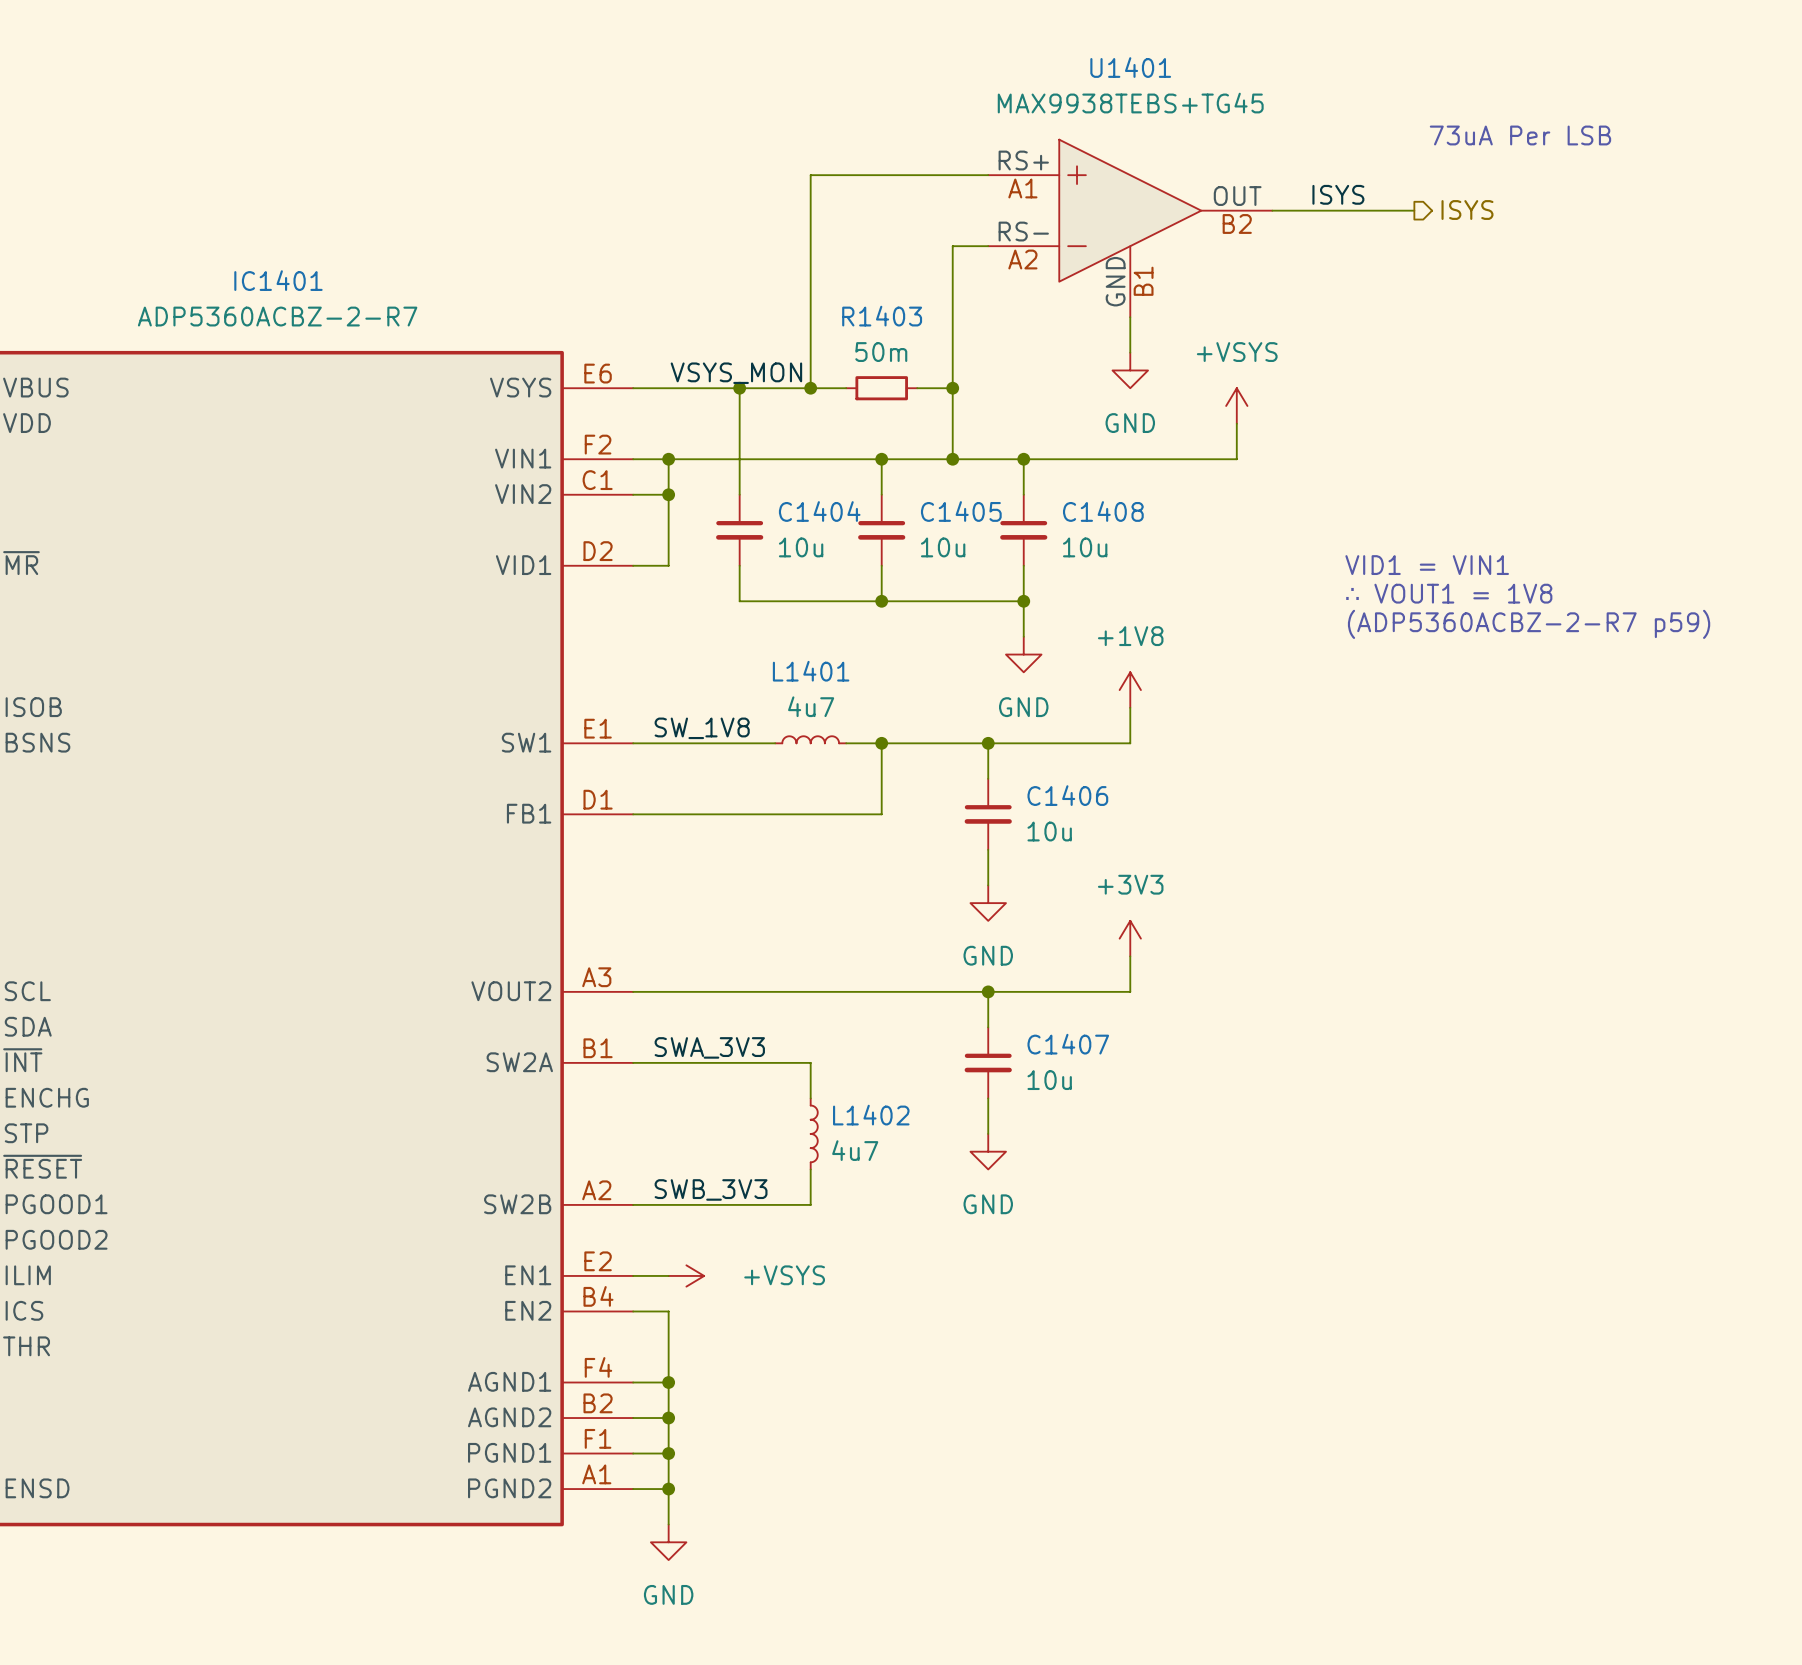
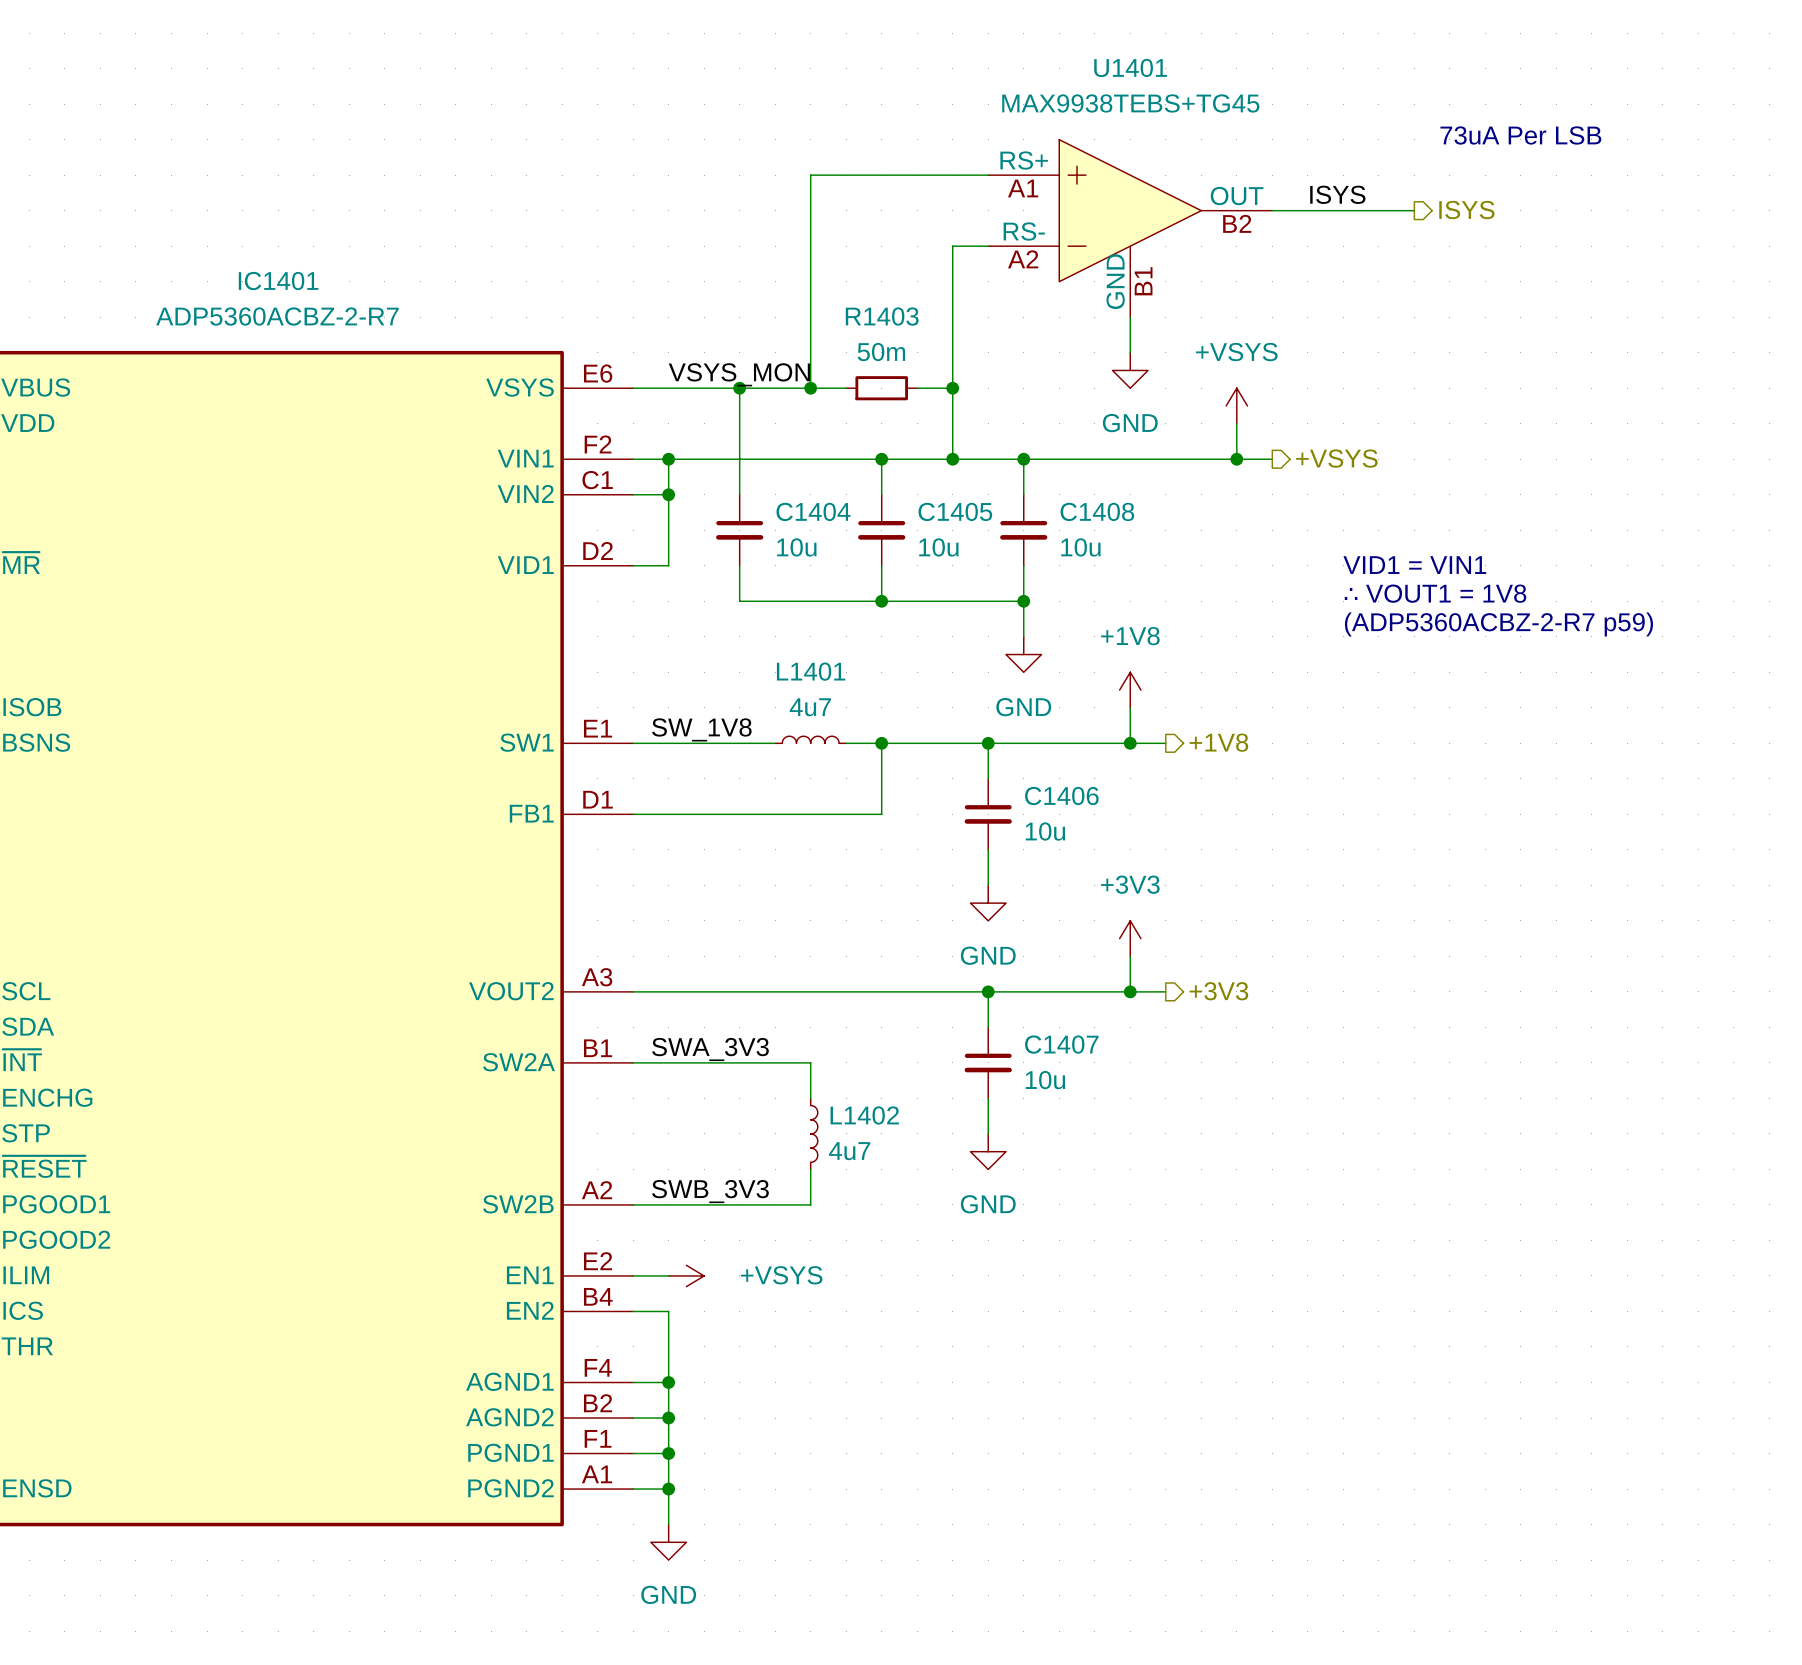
hierarchical label: none -> +VSYS (1336, 458)
wire: none -> (1236, 459) (1272, 459)
junction: none -> (1236, 459)
hierarchical label: none -> +1V8 (1218, 742)
wire: none -> (1130, 743) (1165, 743)
junction: none -> (1130, 743)
wire: none -> (1130, 991) (1165, 991)
junction: none -> (1130, 991)
hierarchical label: none -> +3V3 (1218, 991)

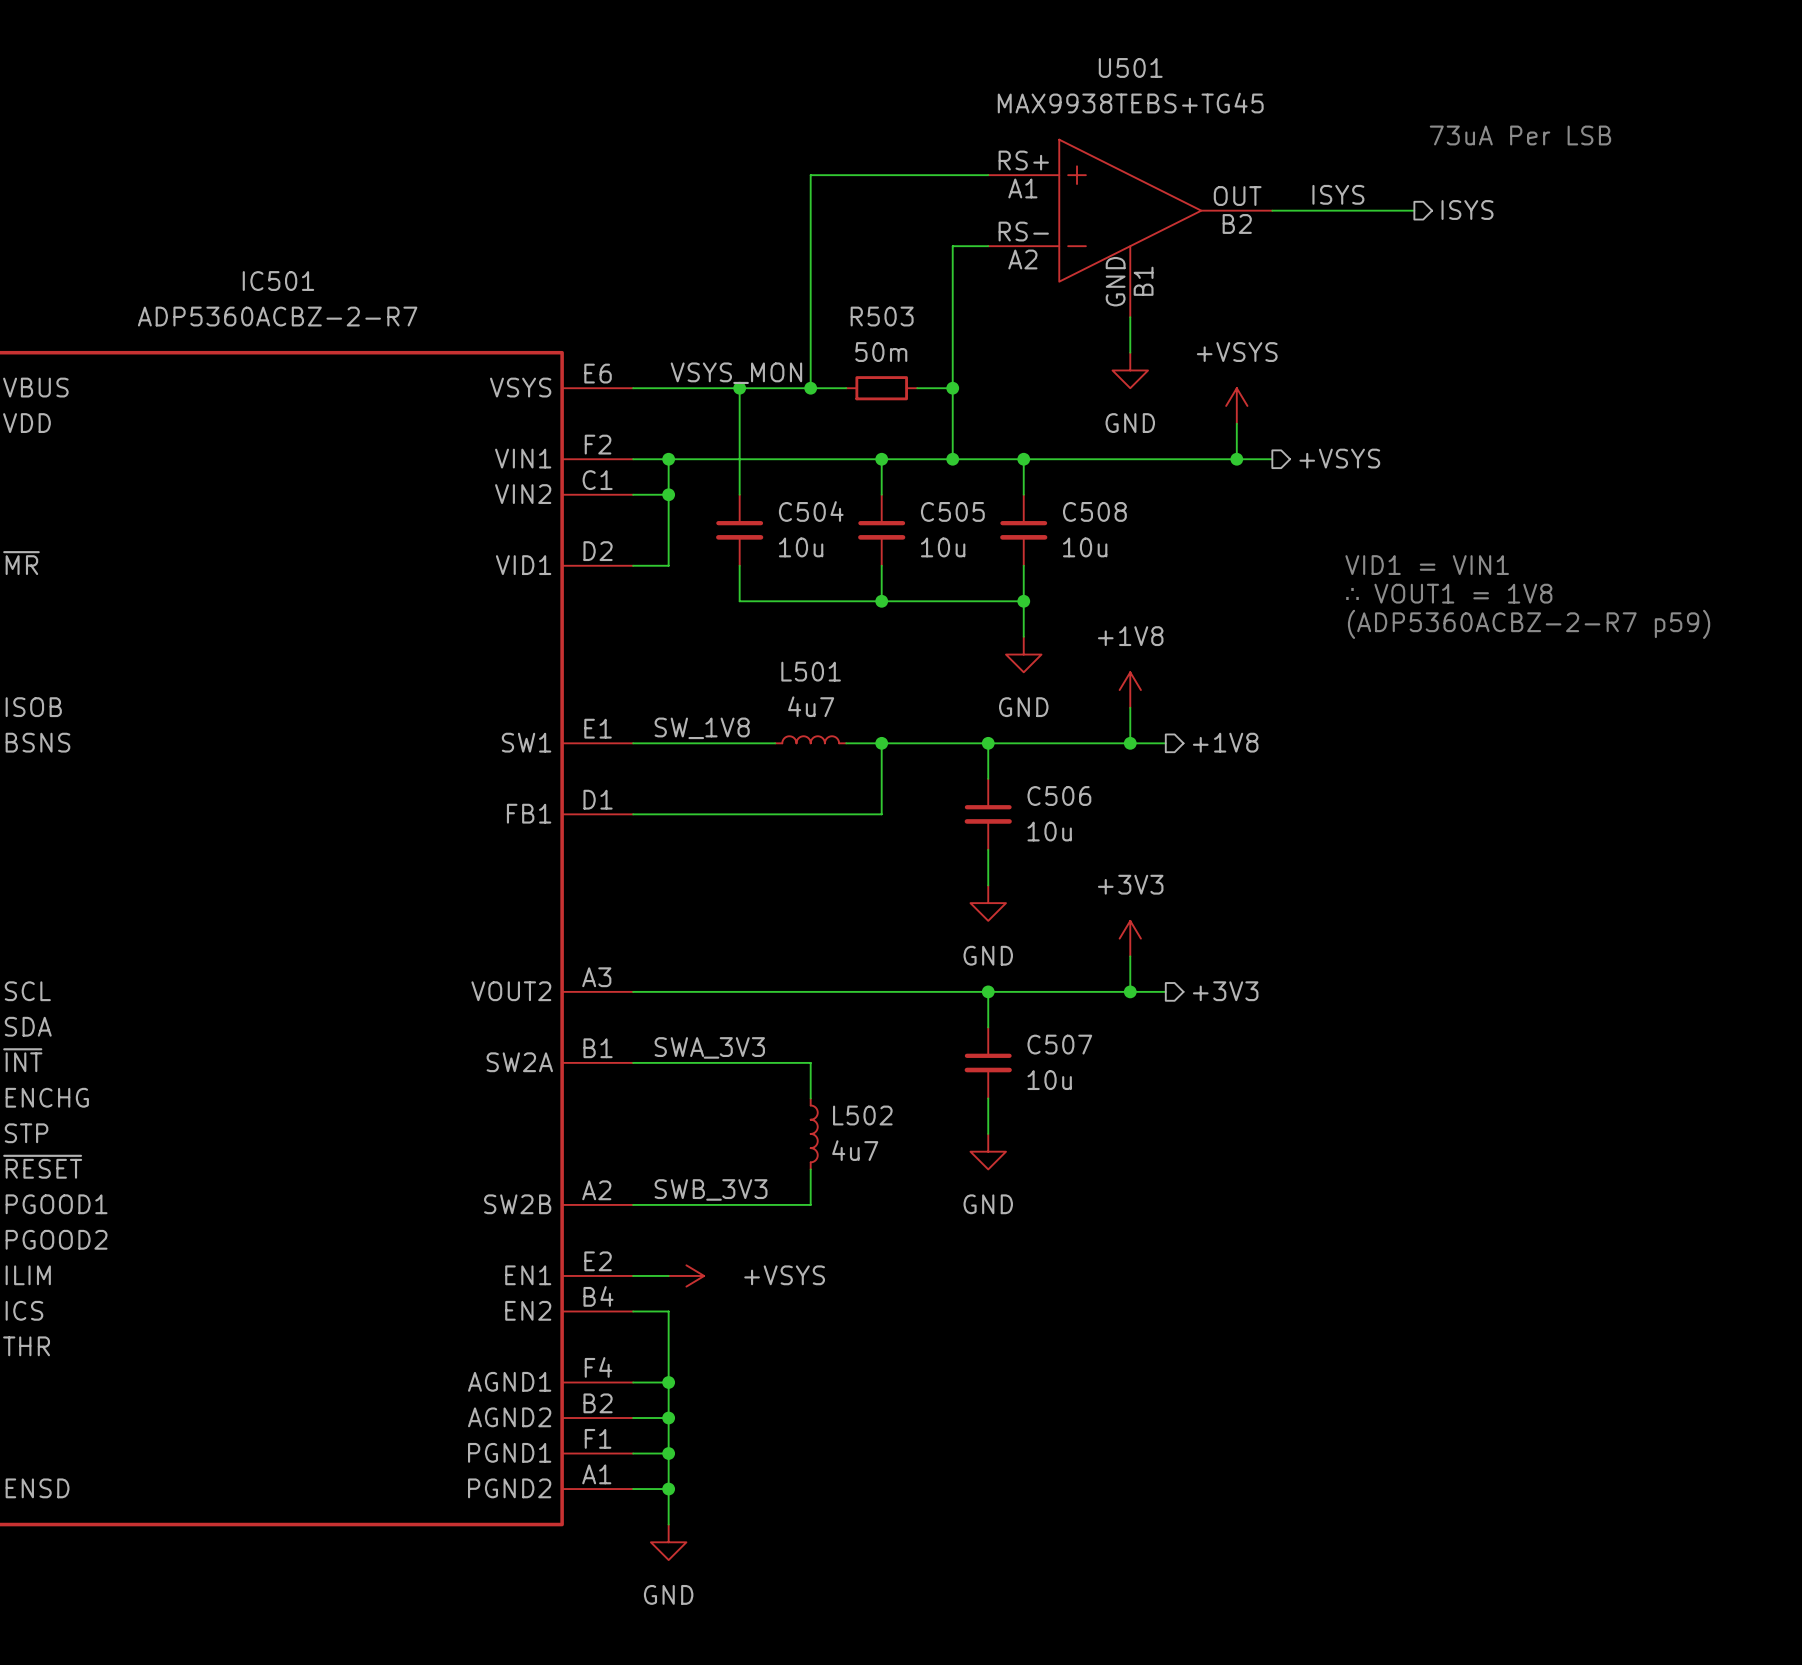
U1401 name: U1401 (1130, 67) -> U501 (1130, 67)
IC1401 name: IC1401 (278, 281) -> IC501 (278, 281)
R1403 name: R1403 (882, 316) -> R503 (882, 316)
C1404 name: C1404 (813, 511) -> C504 (811, 511)
C1405 name: C1405 (955, 511) -> C505 (952, 511)
C1408 name: C1408 (1097, 511) -> C508 (1094, 511)
L1401 name: L1401 (811, 671) -> L501 (811, 671)
C1406 name: C1406 (1061, 796) -> C506 (1059, 796)
C1407 name: C1407 (1061, 1044) -> C507 (1059, 1044)
L1402 name: L1402 (864, 1115) -> L502 (862, 1115)

